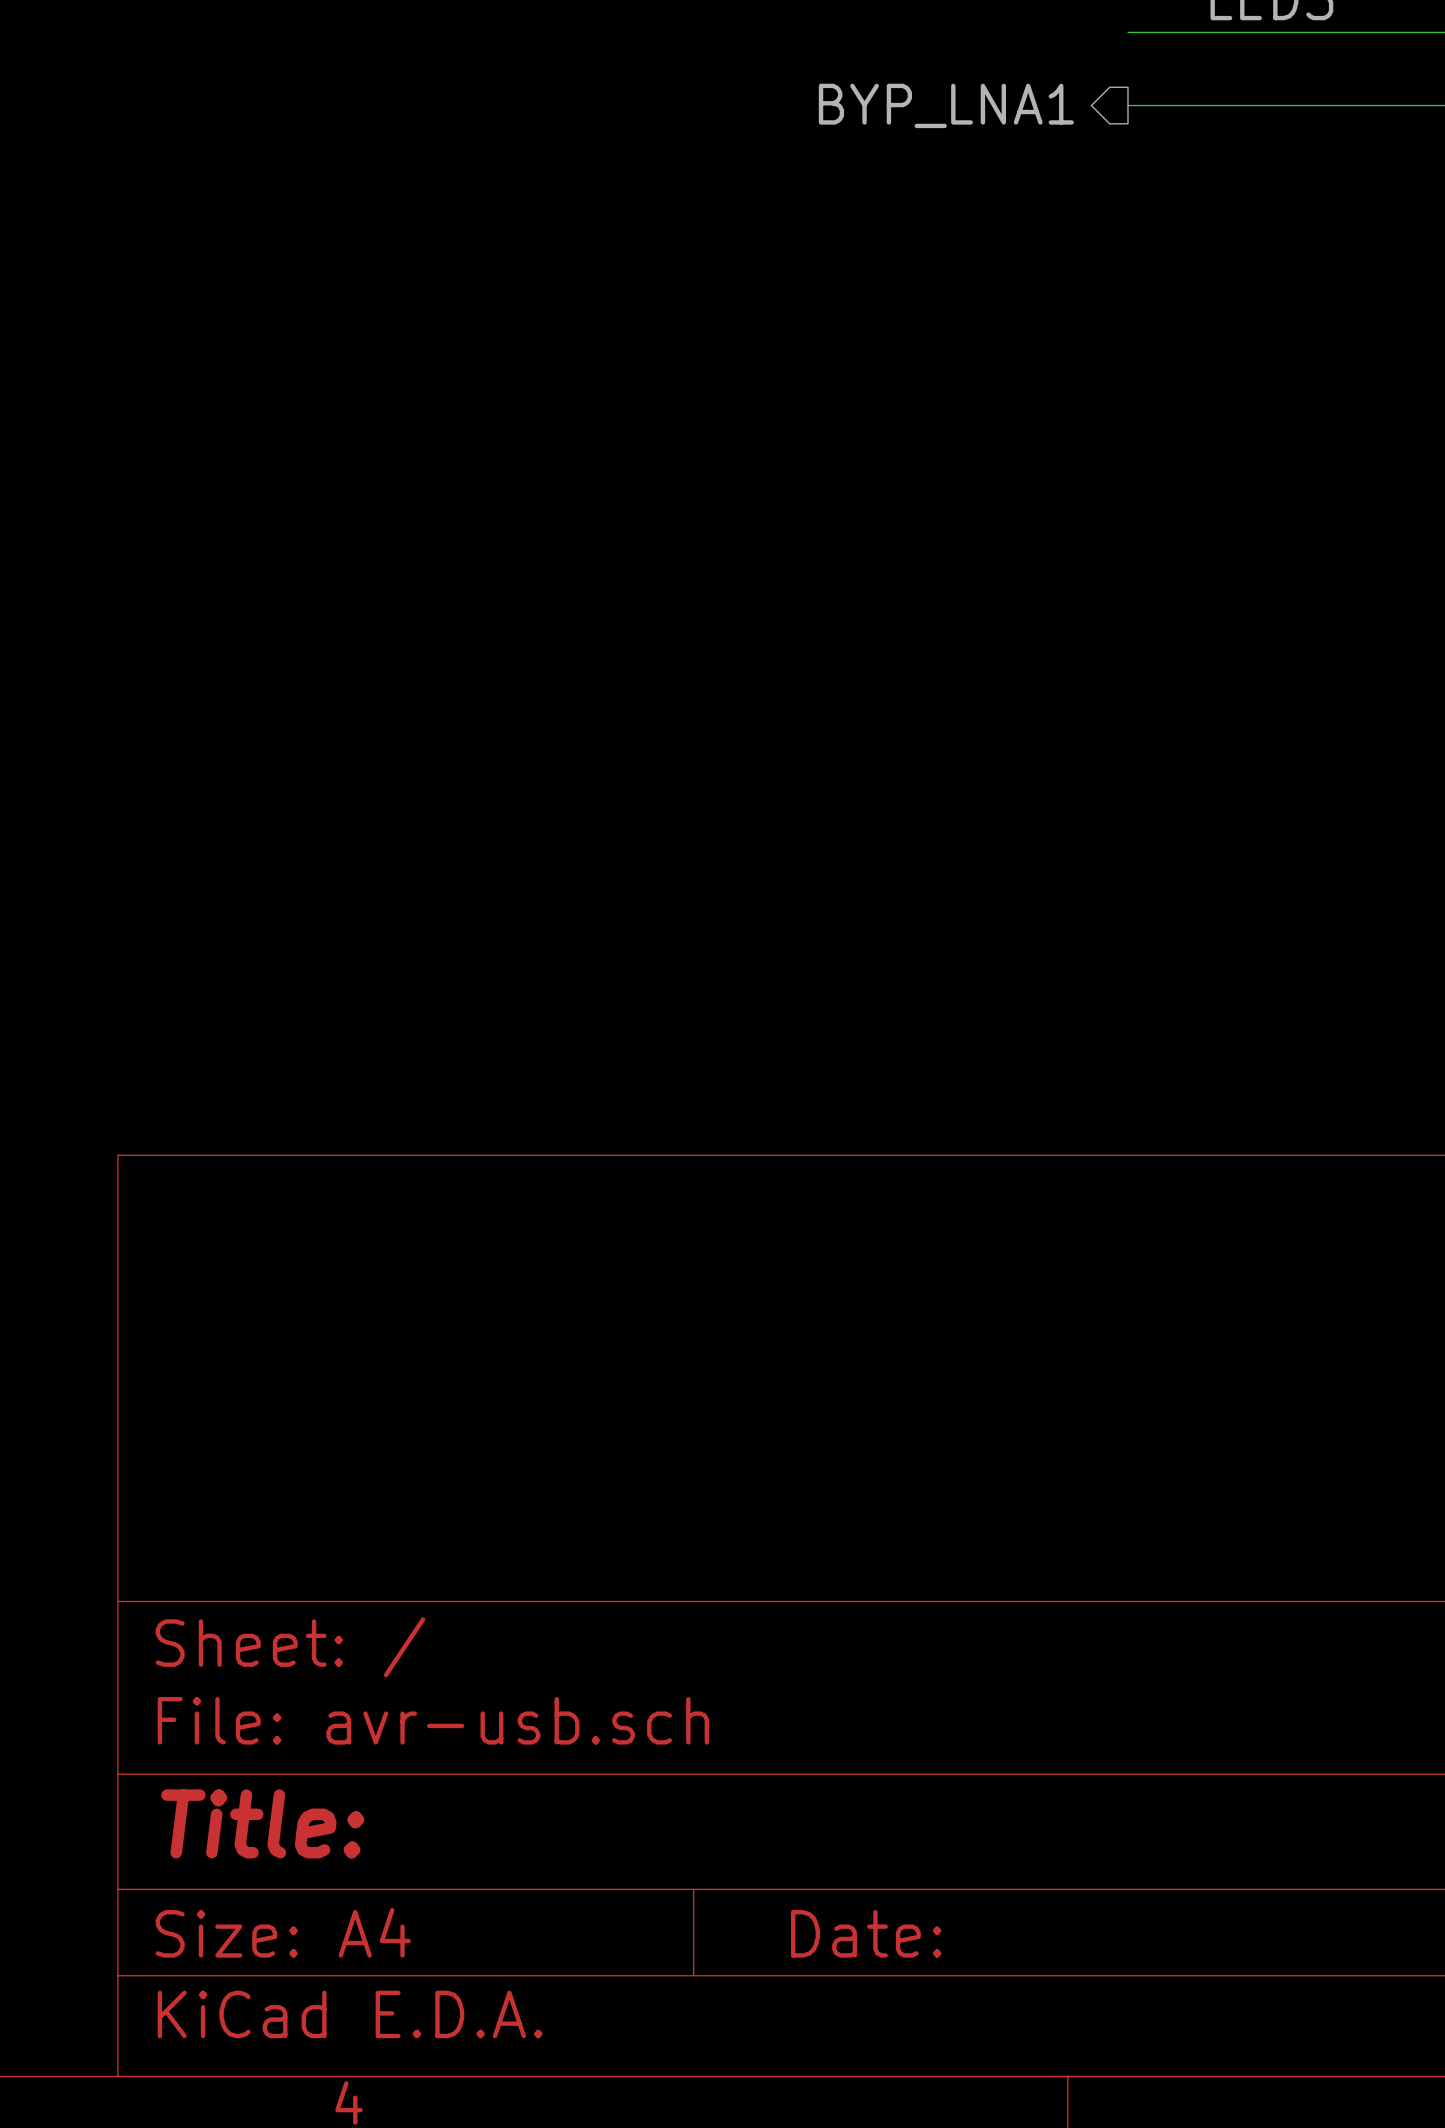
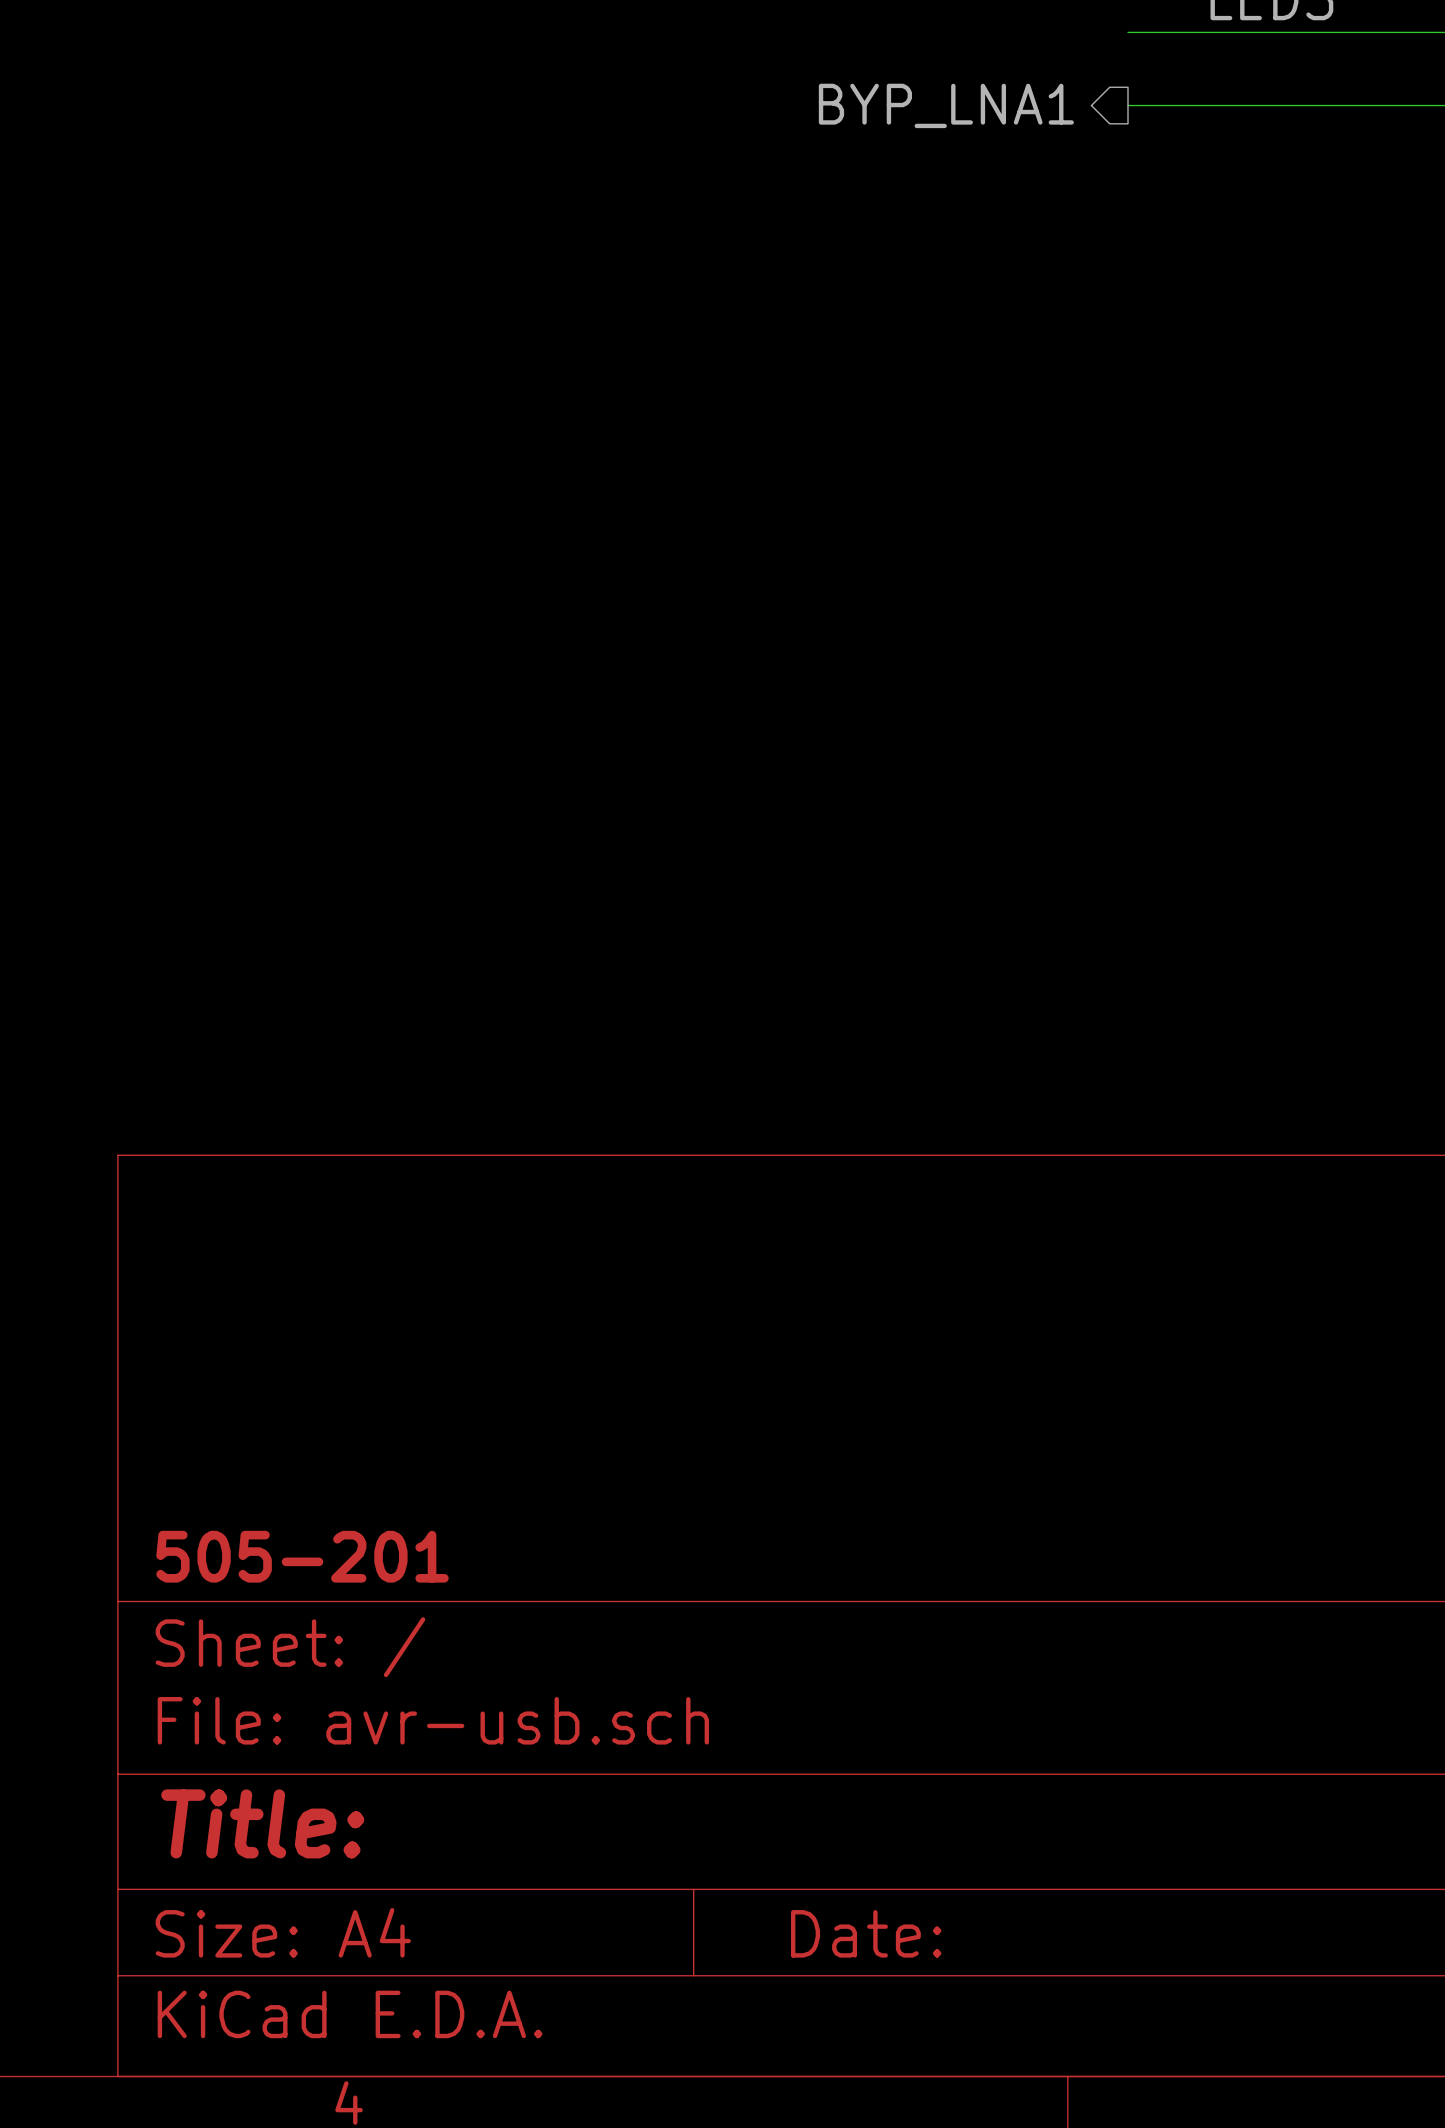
title block: none -> 505-201 (302, 1556)

